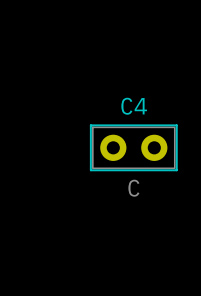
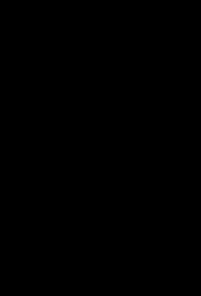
C4: C (133, 147) -> none

